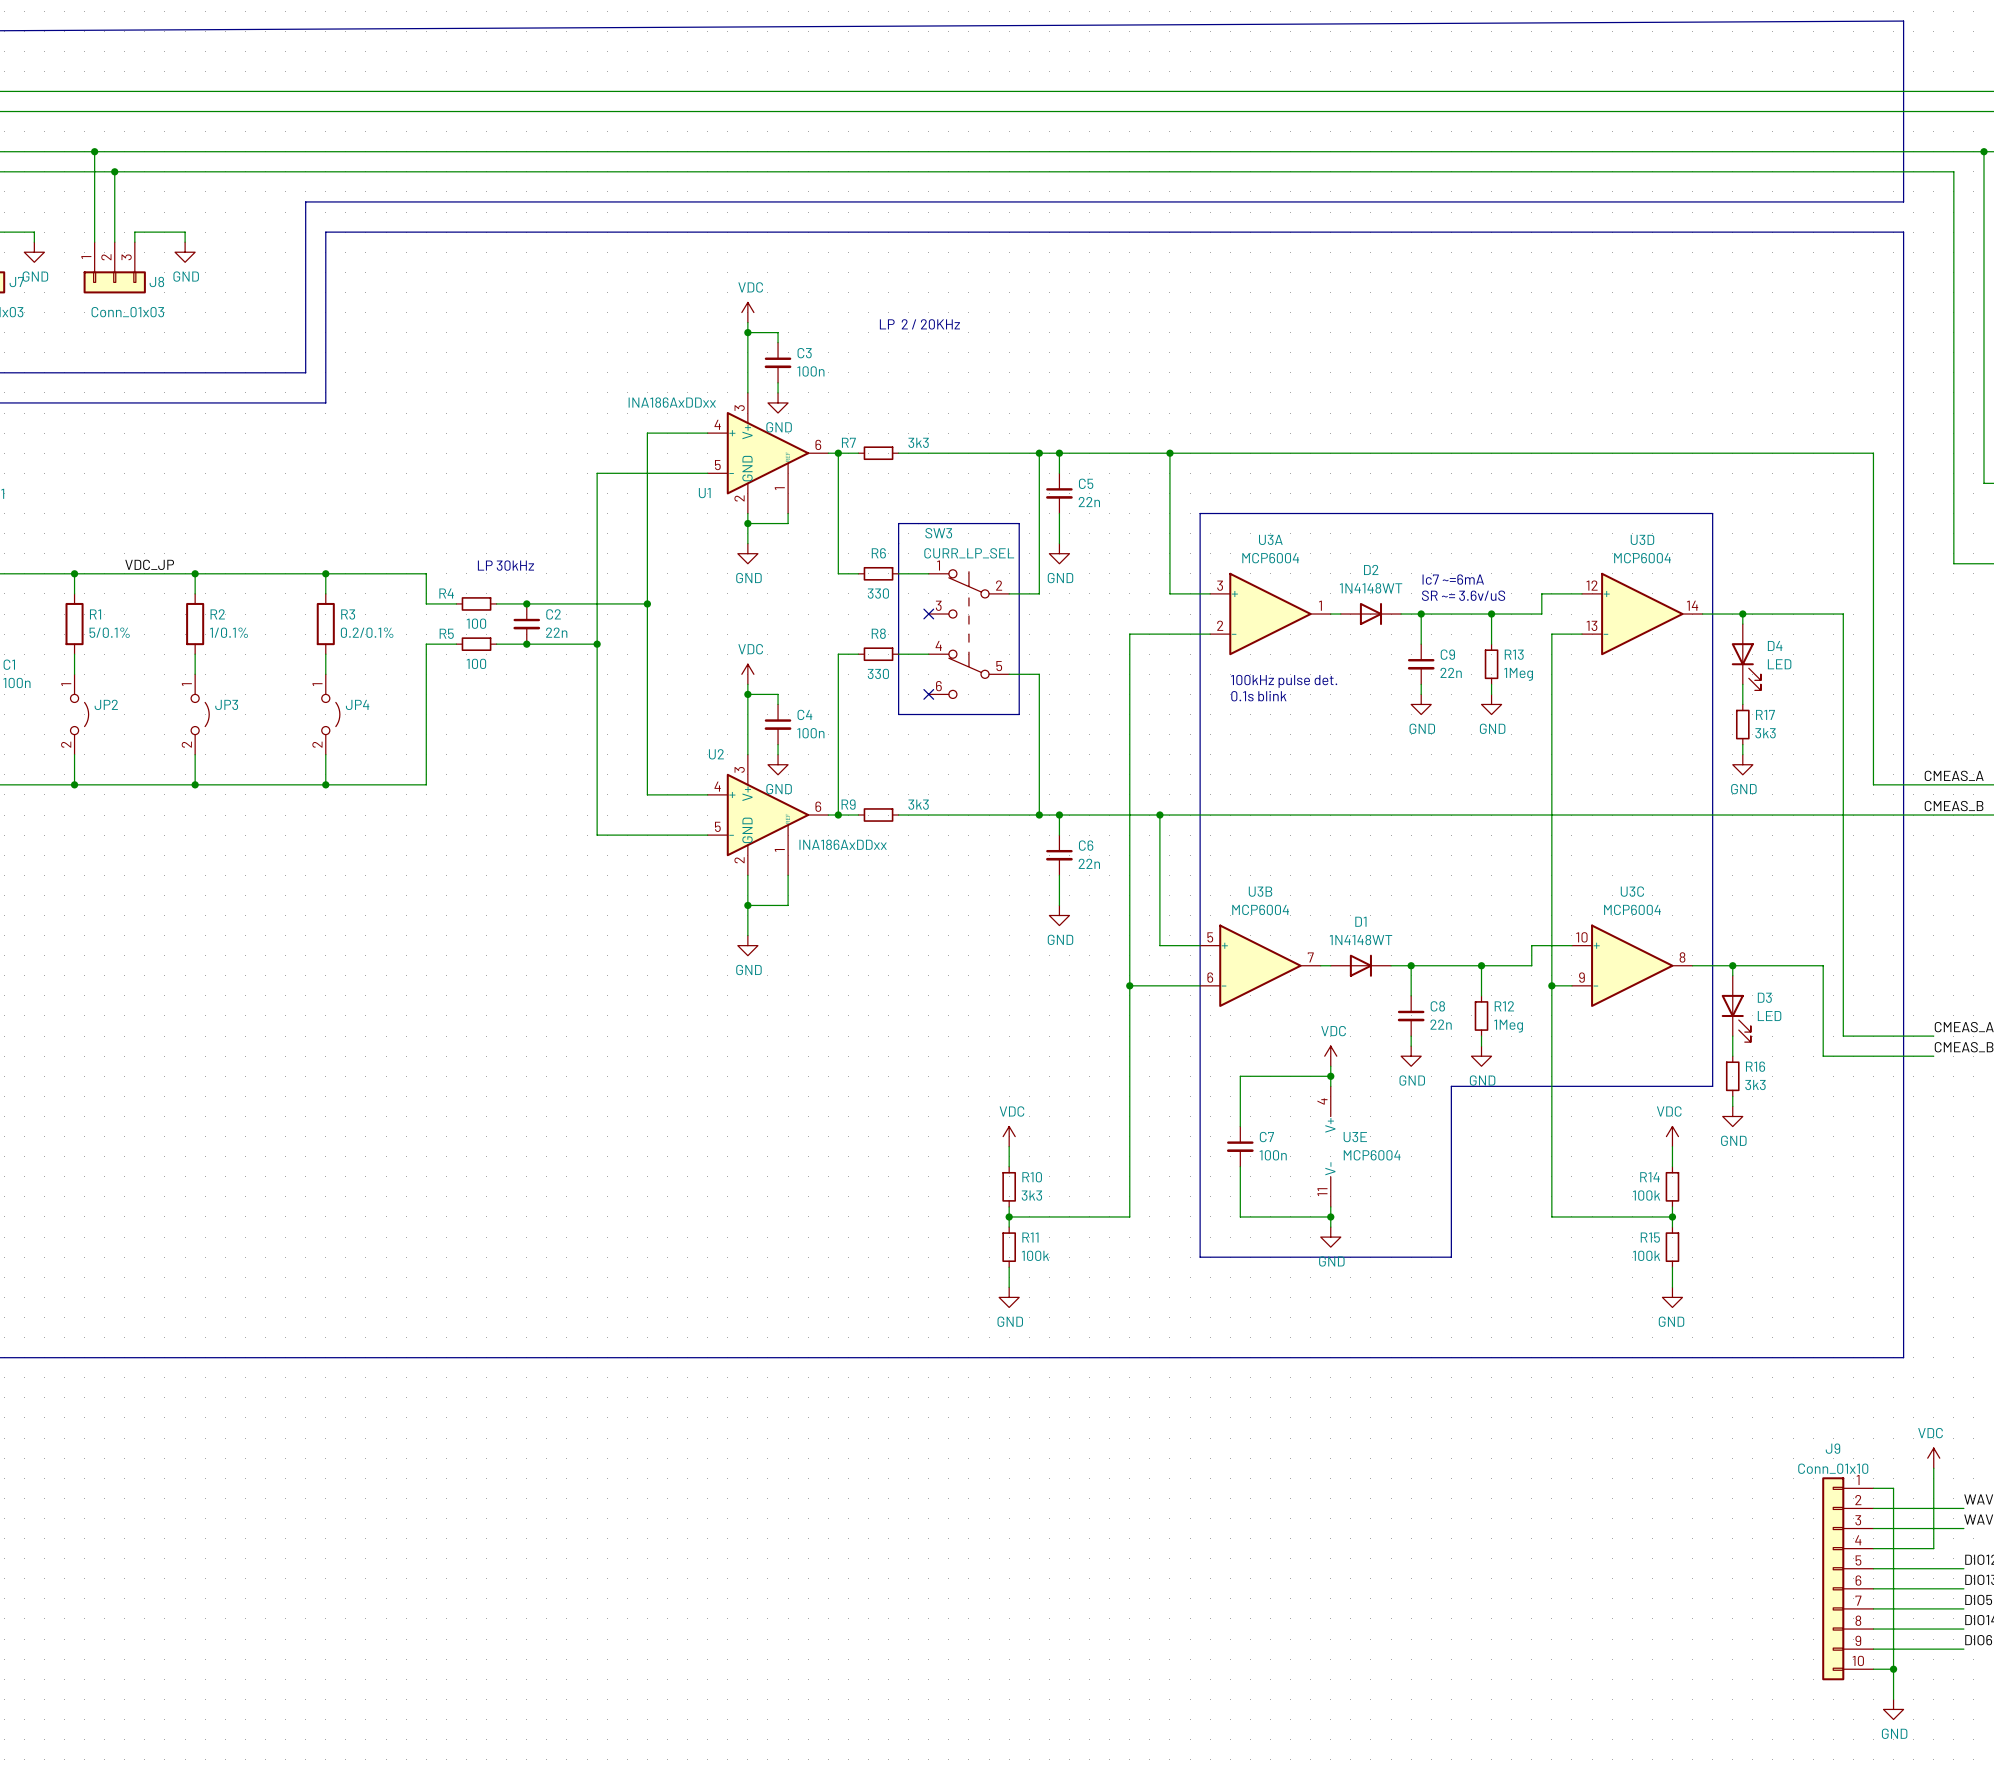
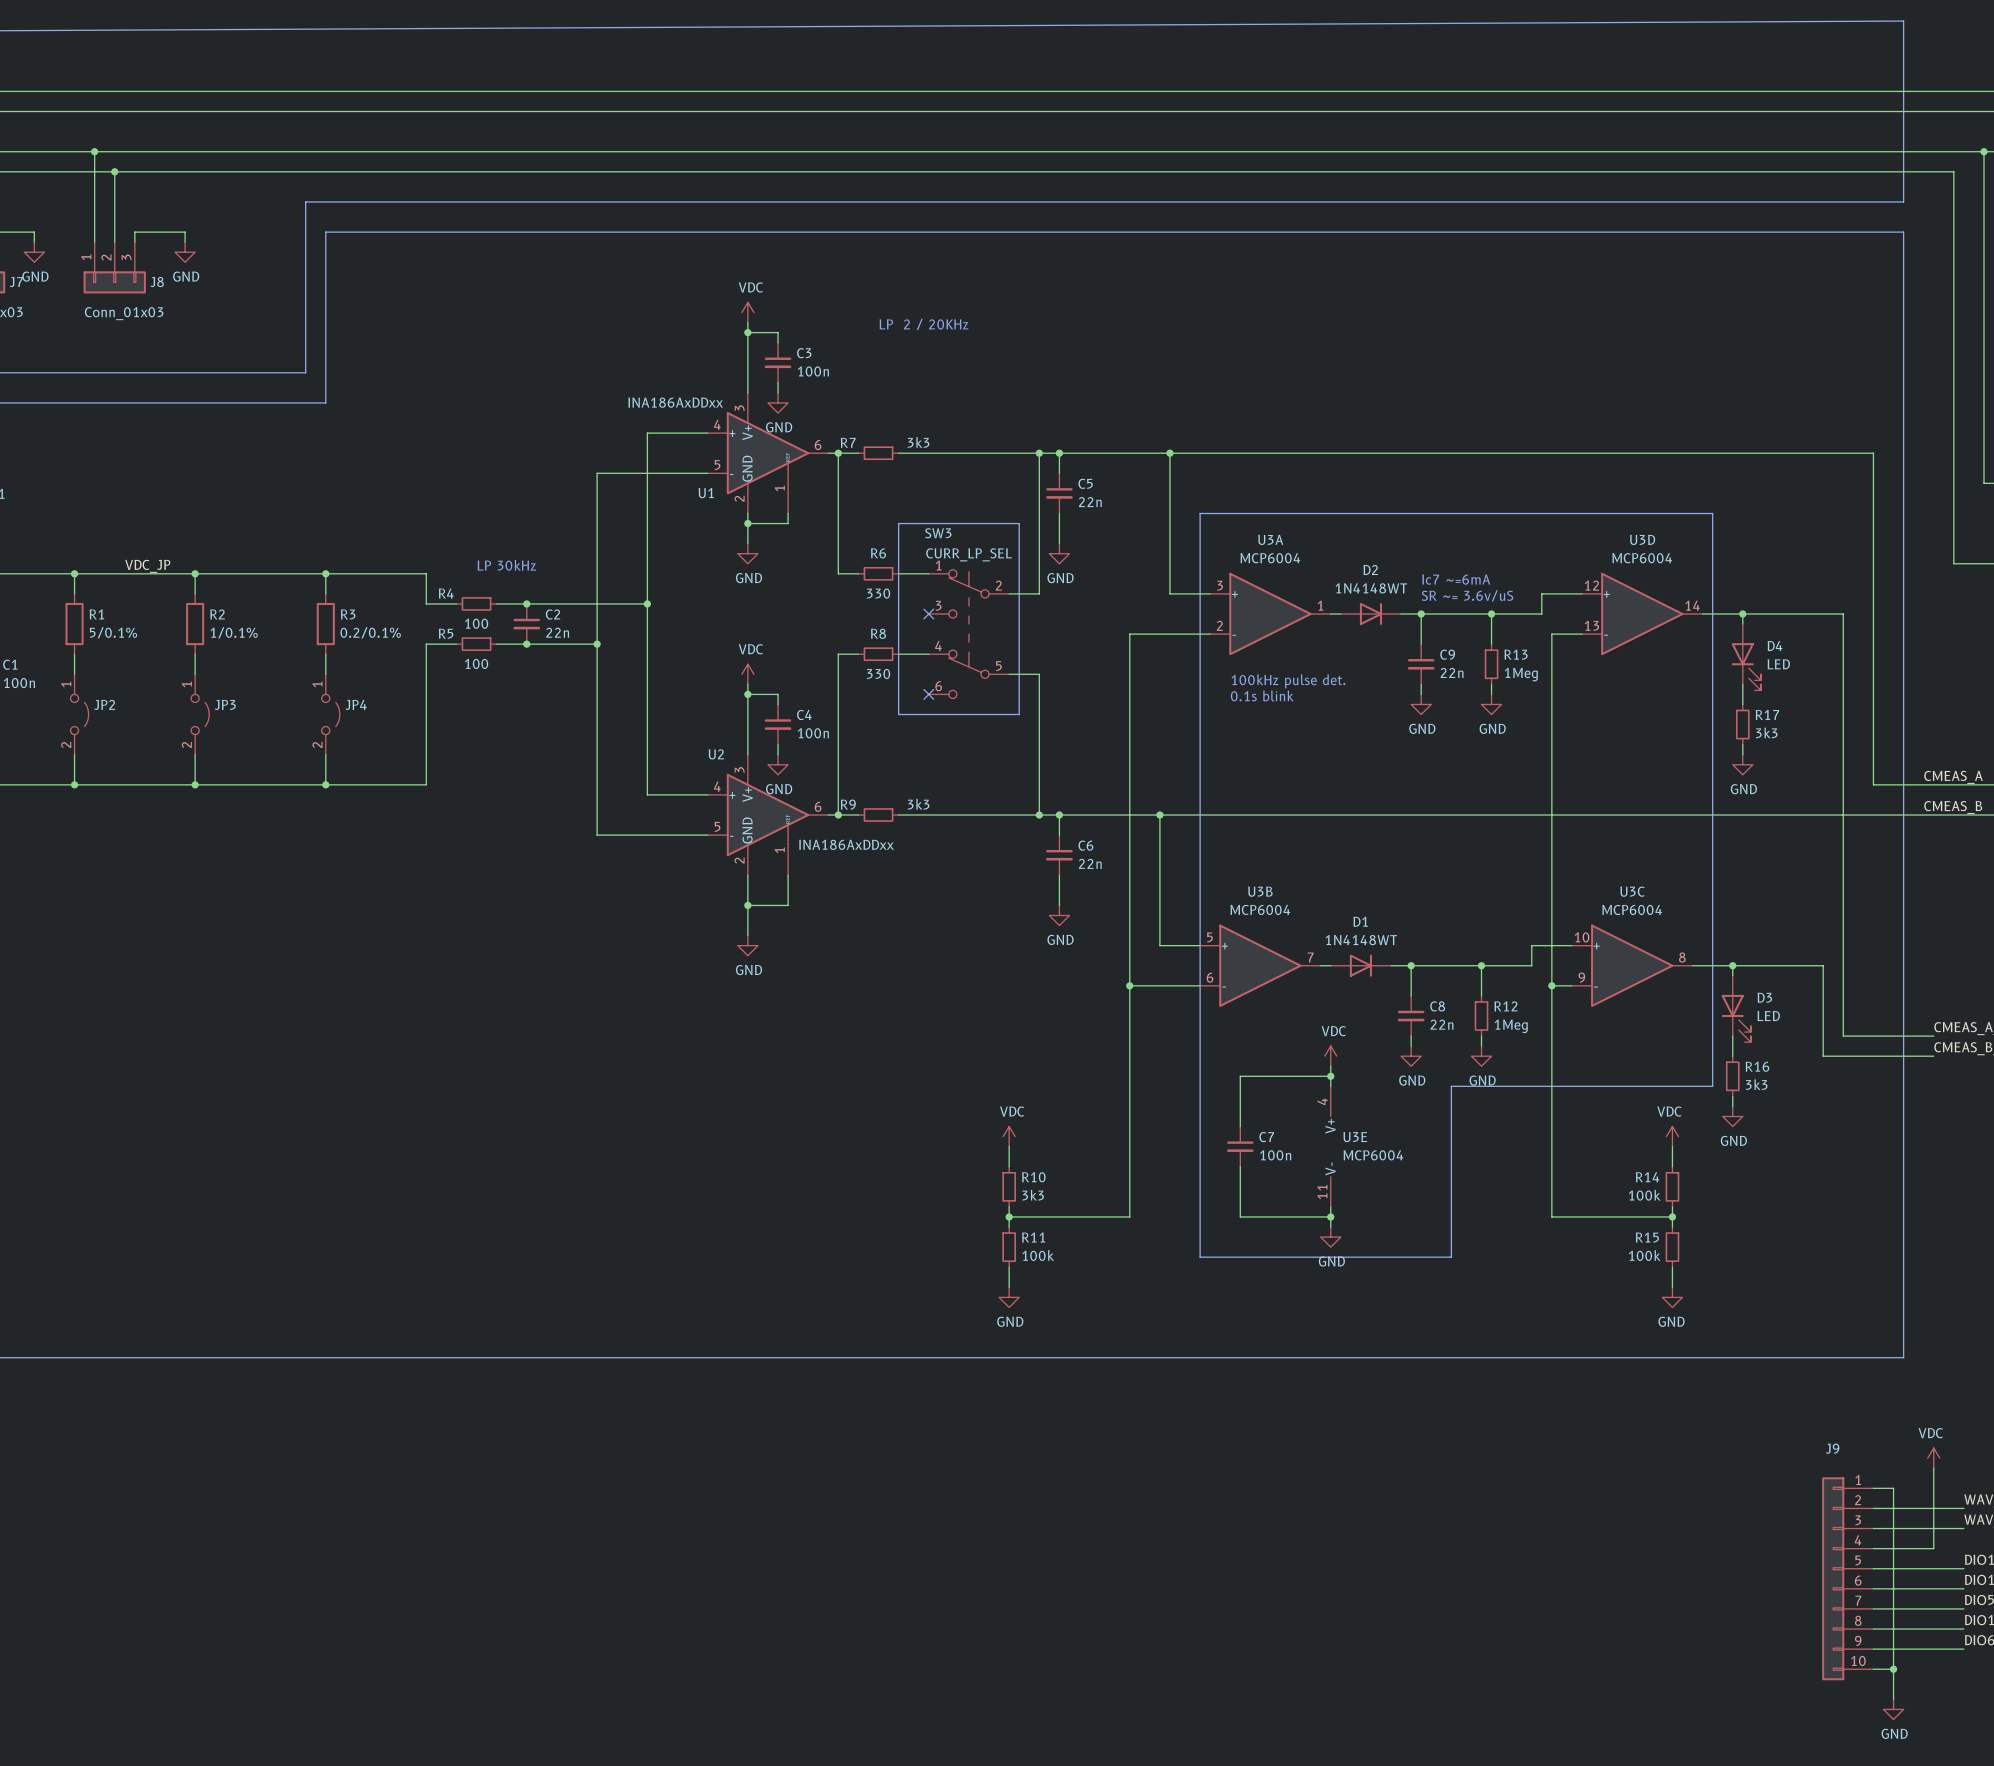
J9 value: Conn_01x10 (1833, 1468) -> none

